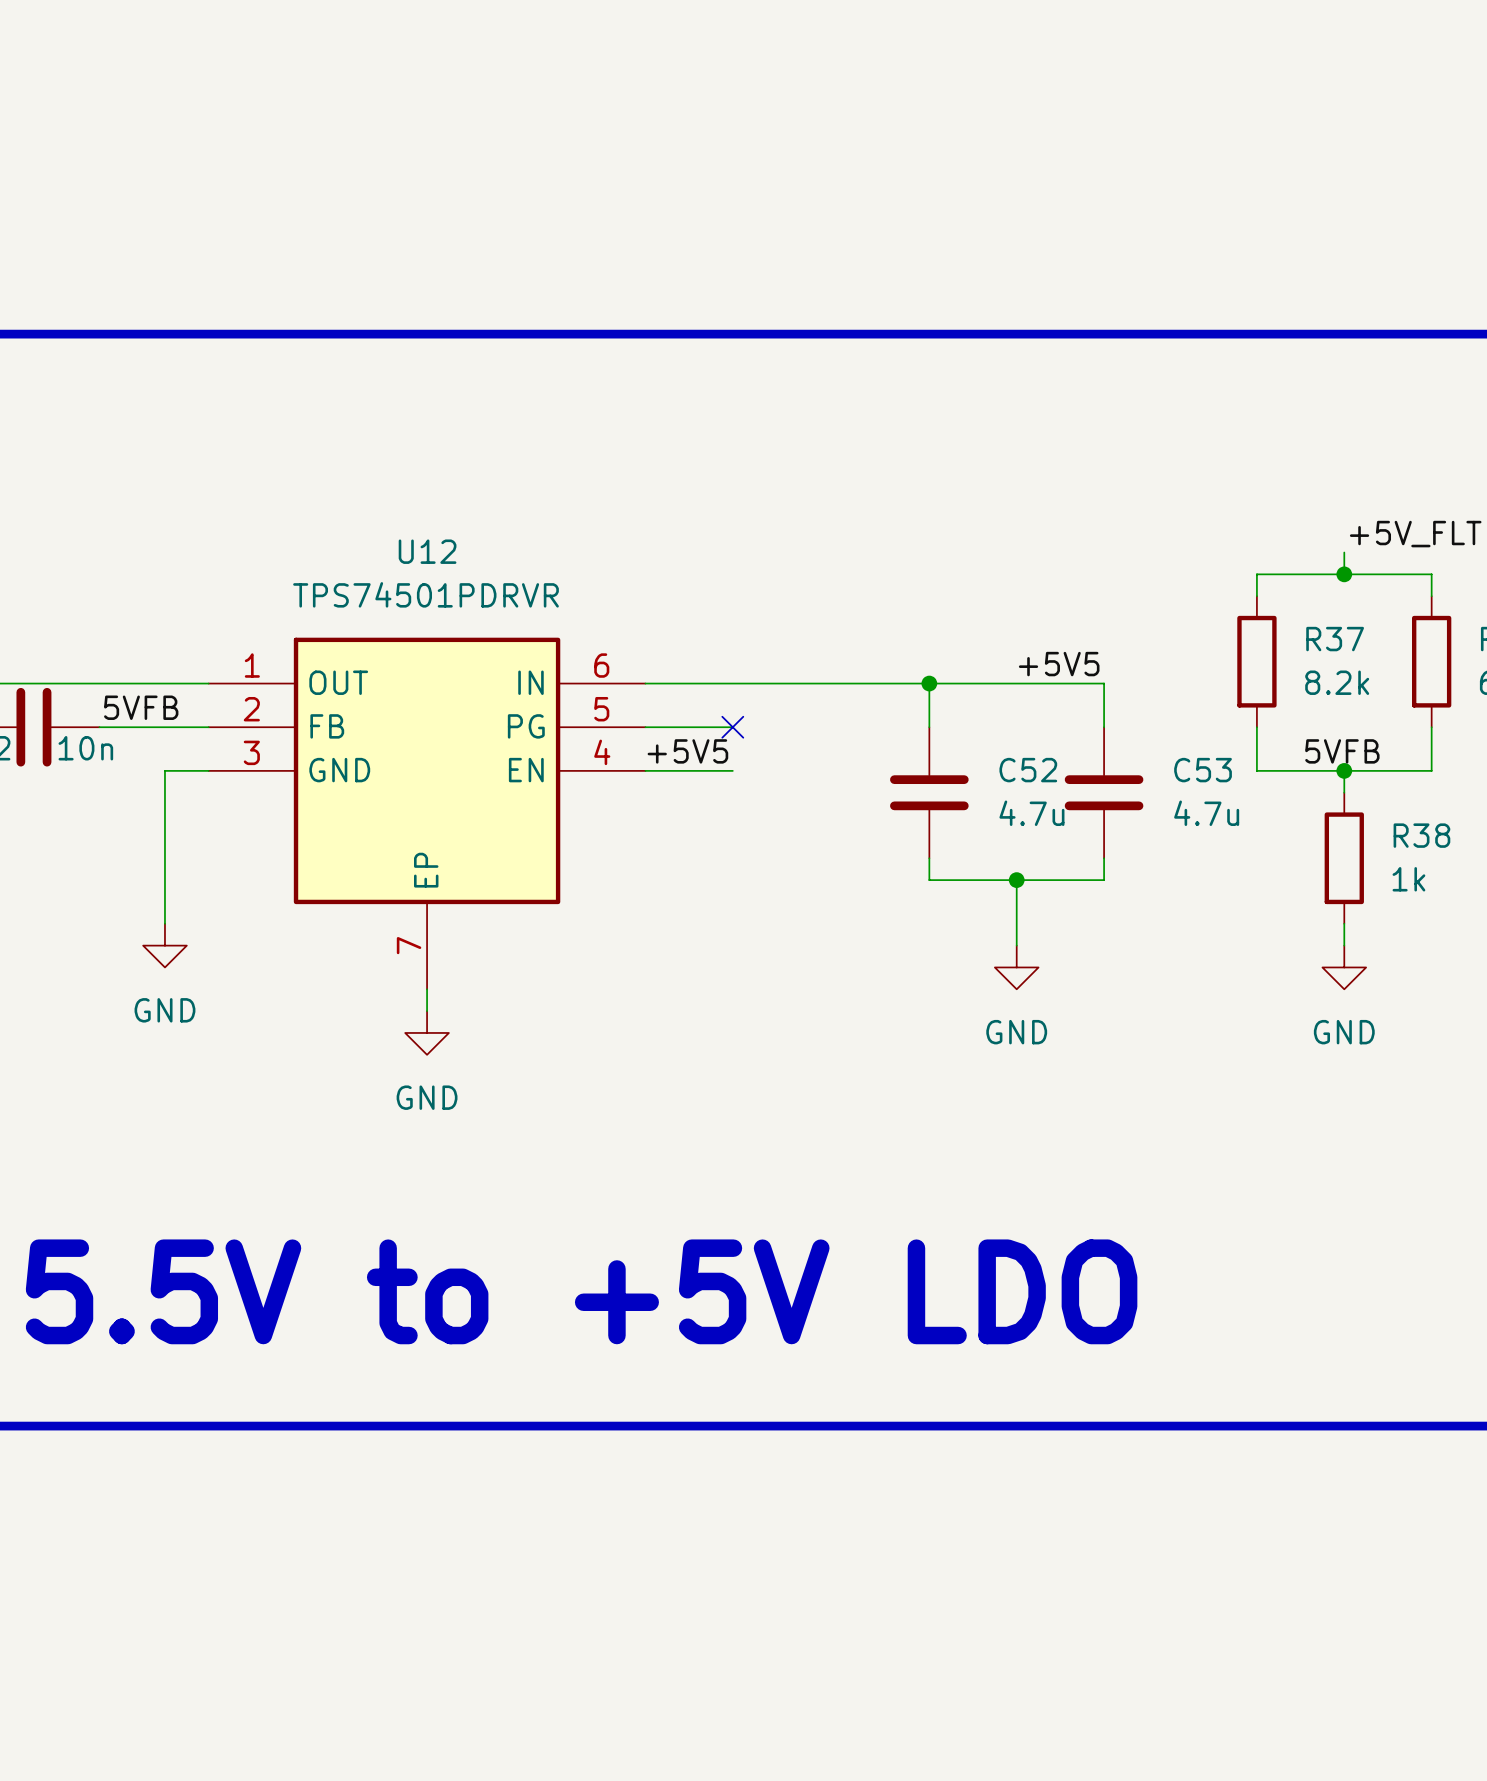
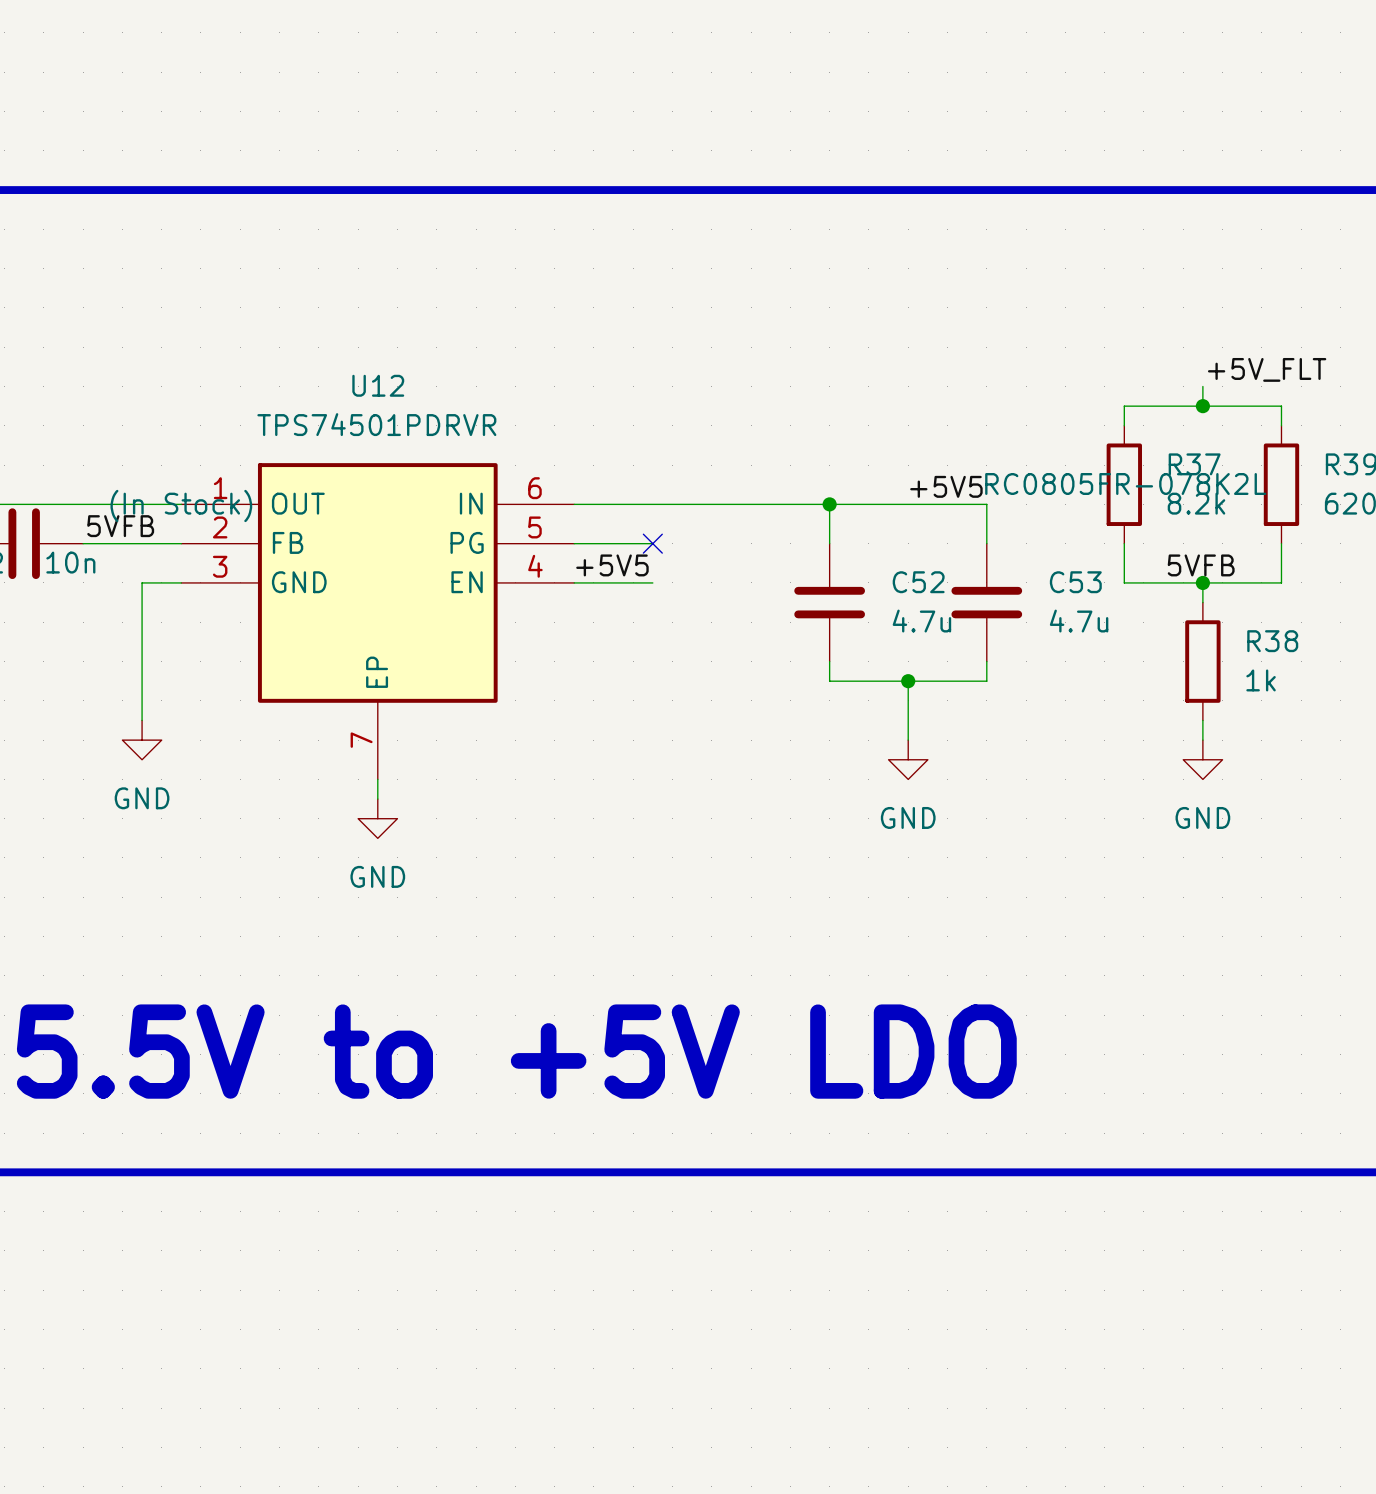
R37 text: none -> RC0805FR-078K2L (1125, 484)
U12 text: none -> (In Stock) (181, 505)

